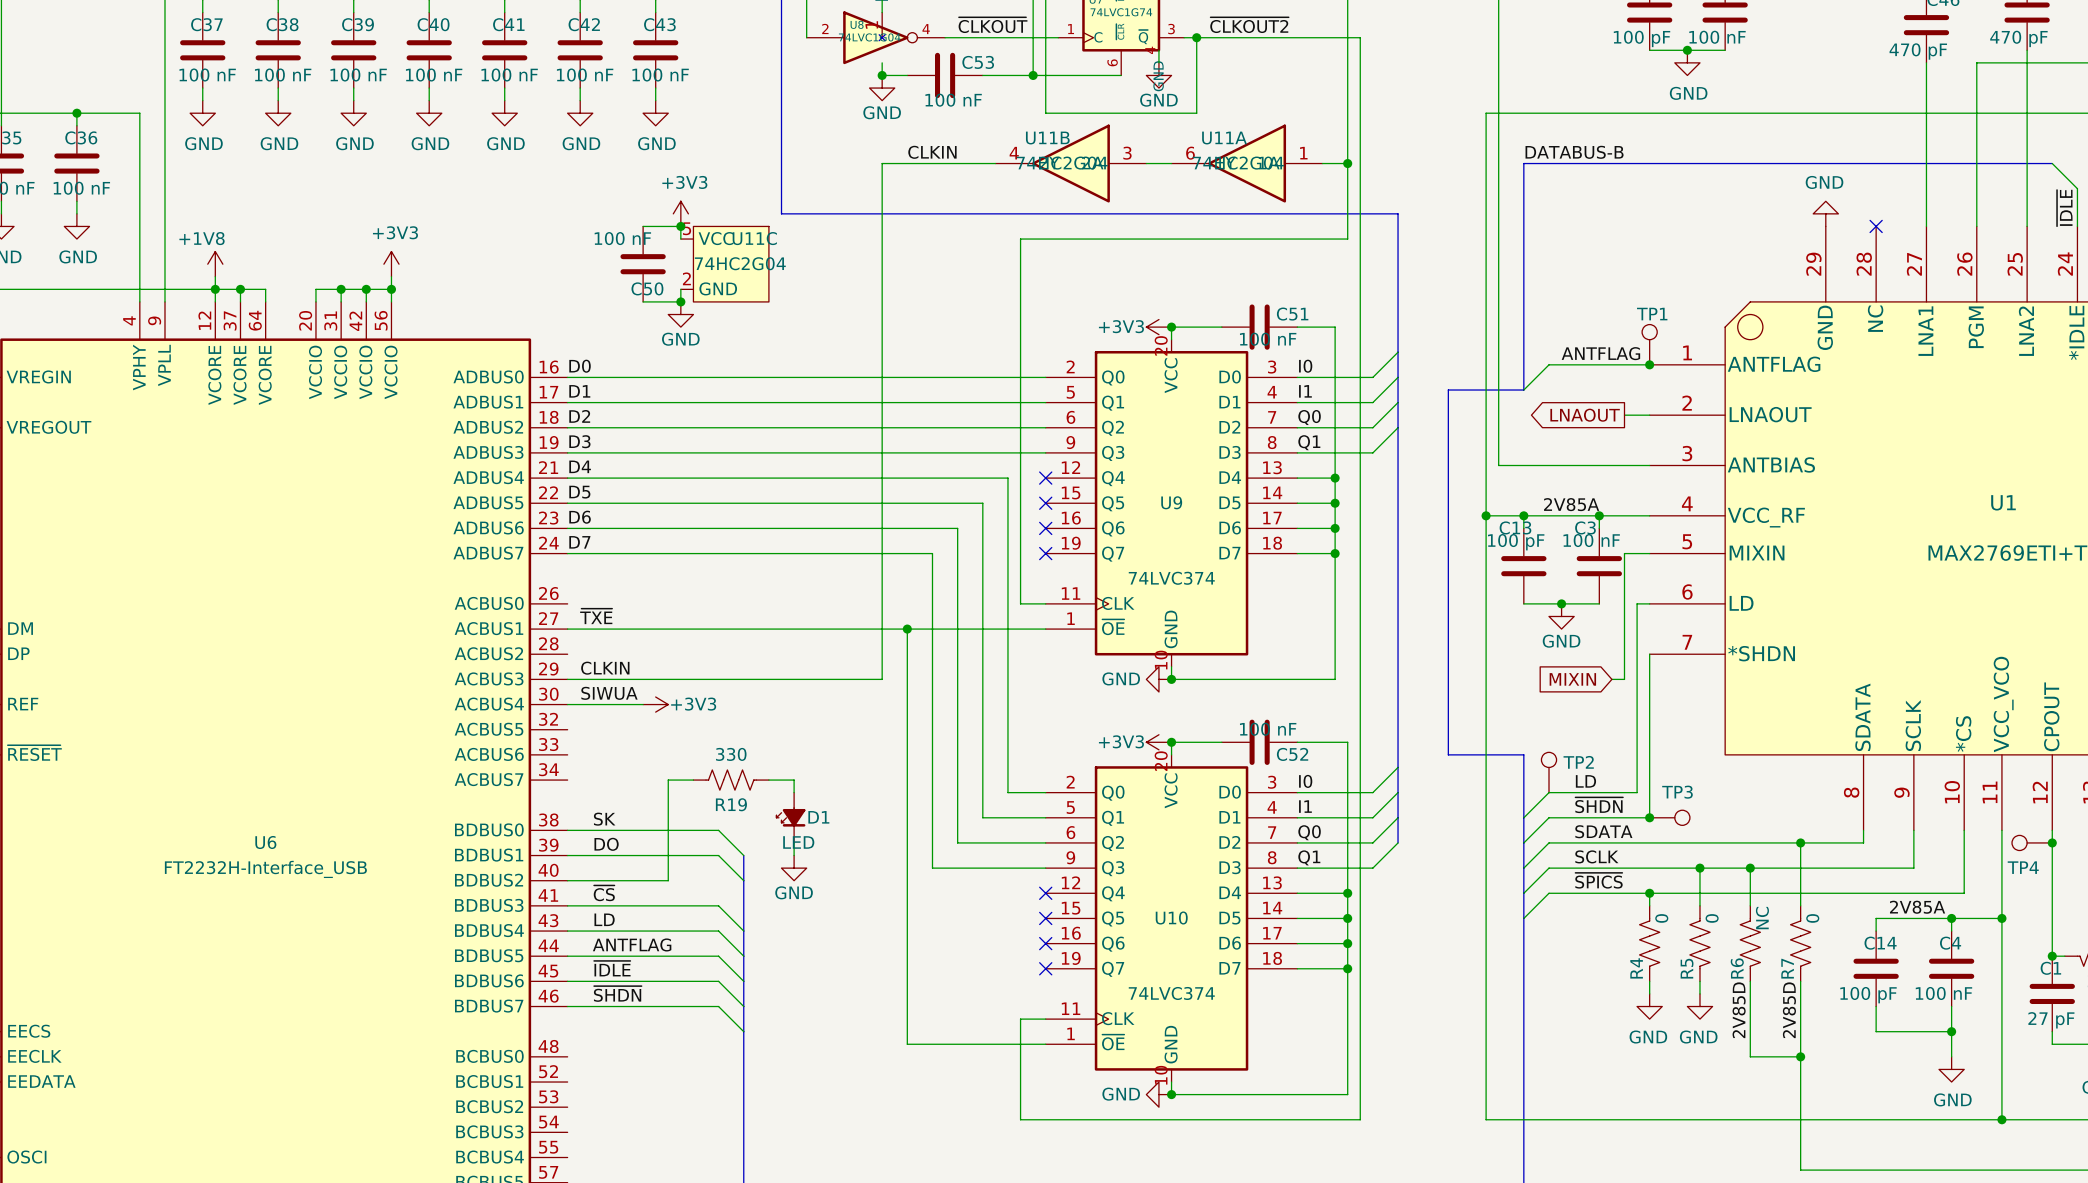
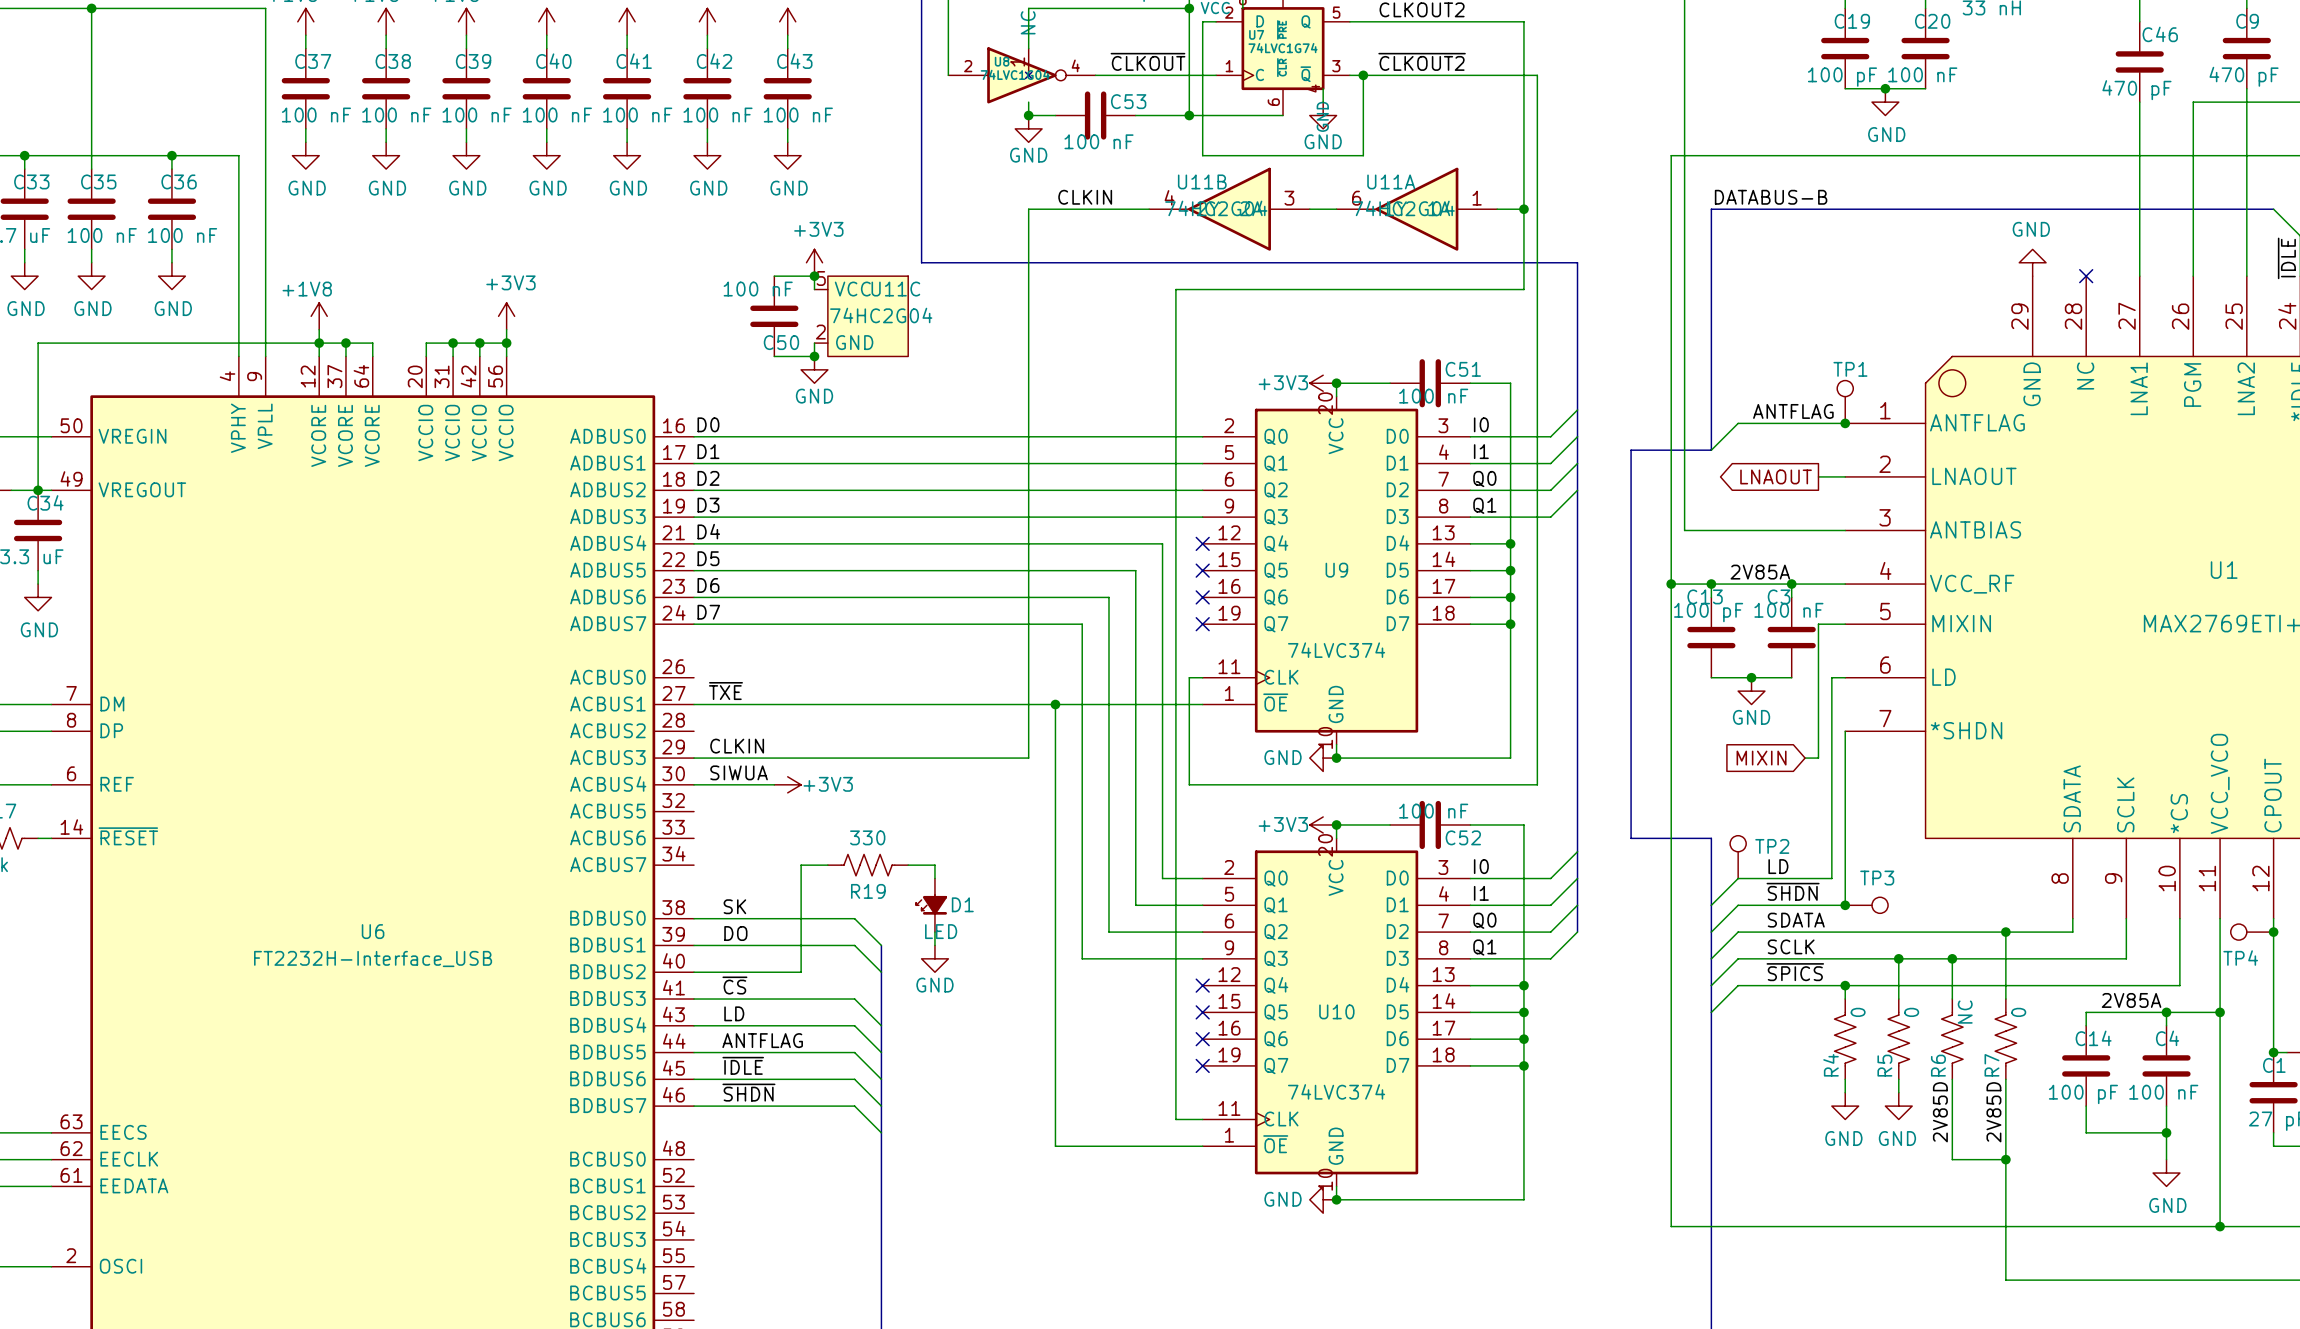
wire: (1020, 603) (1033, 603) -> (1537, 784) (1189, 784) (1189, 677)
wire: (1360, 704) (1360, 1119) (1020, 1119) (1020, 1019) -> (1175, 677) (1175, 1119)

